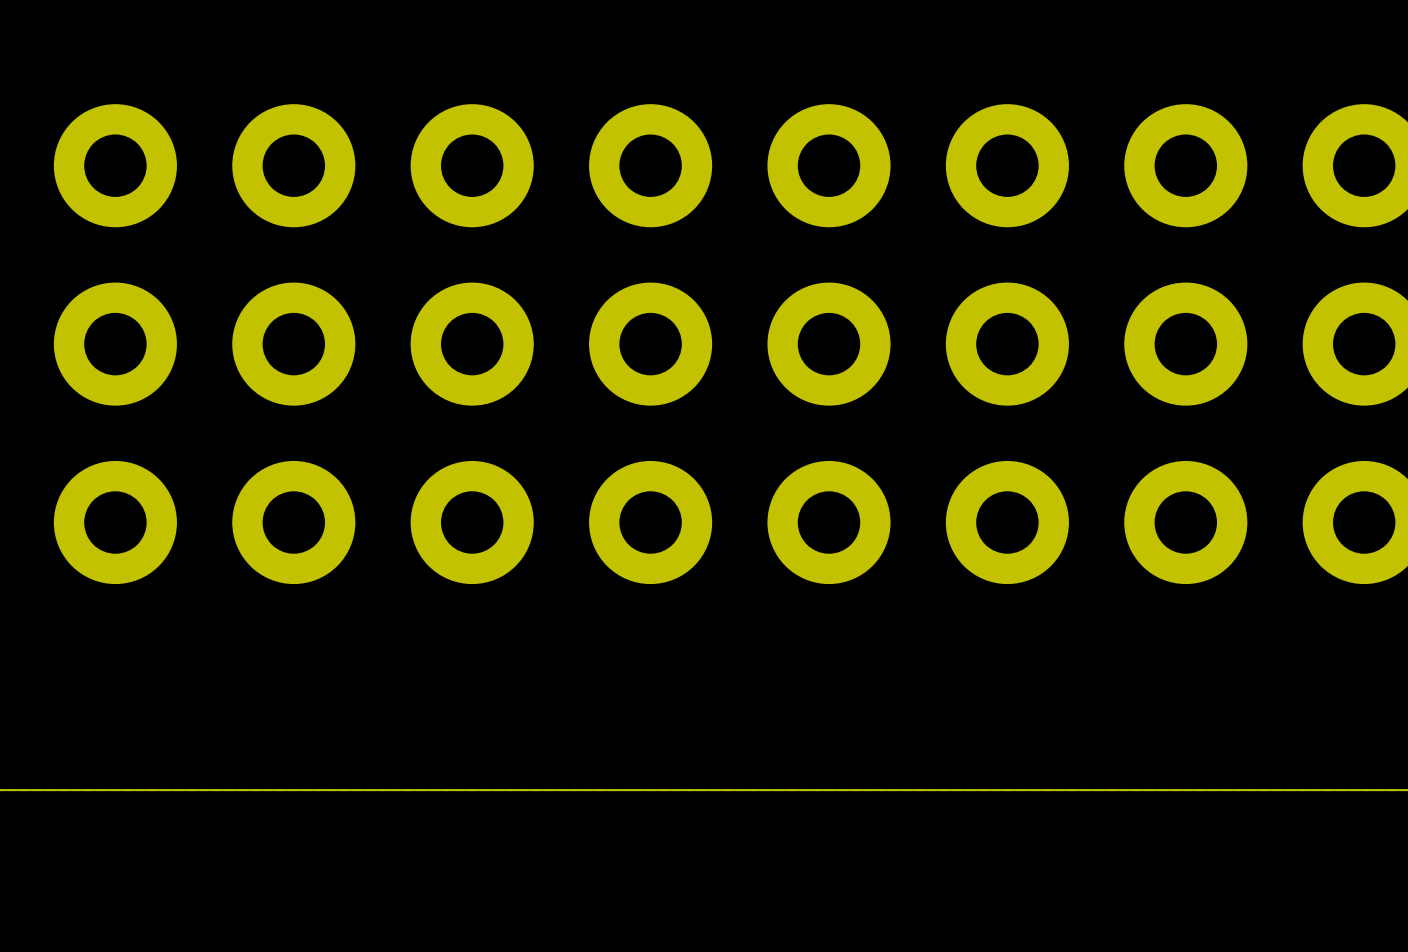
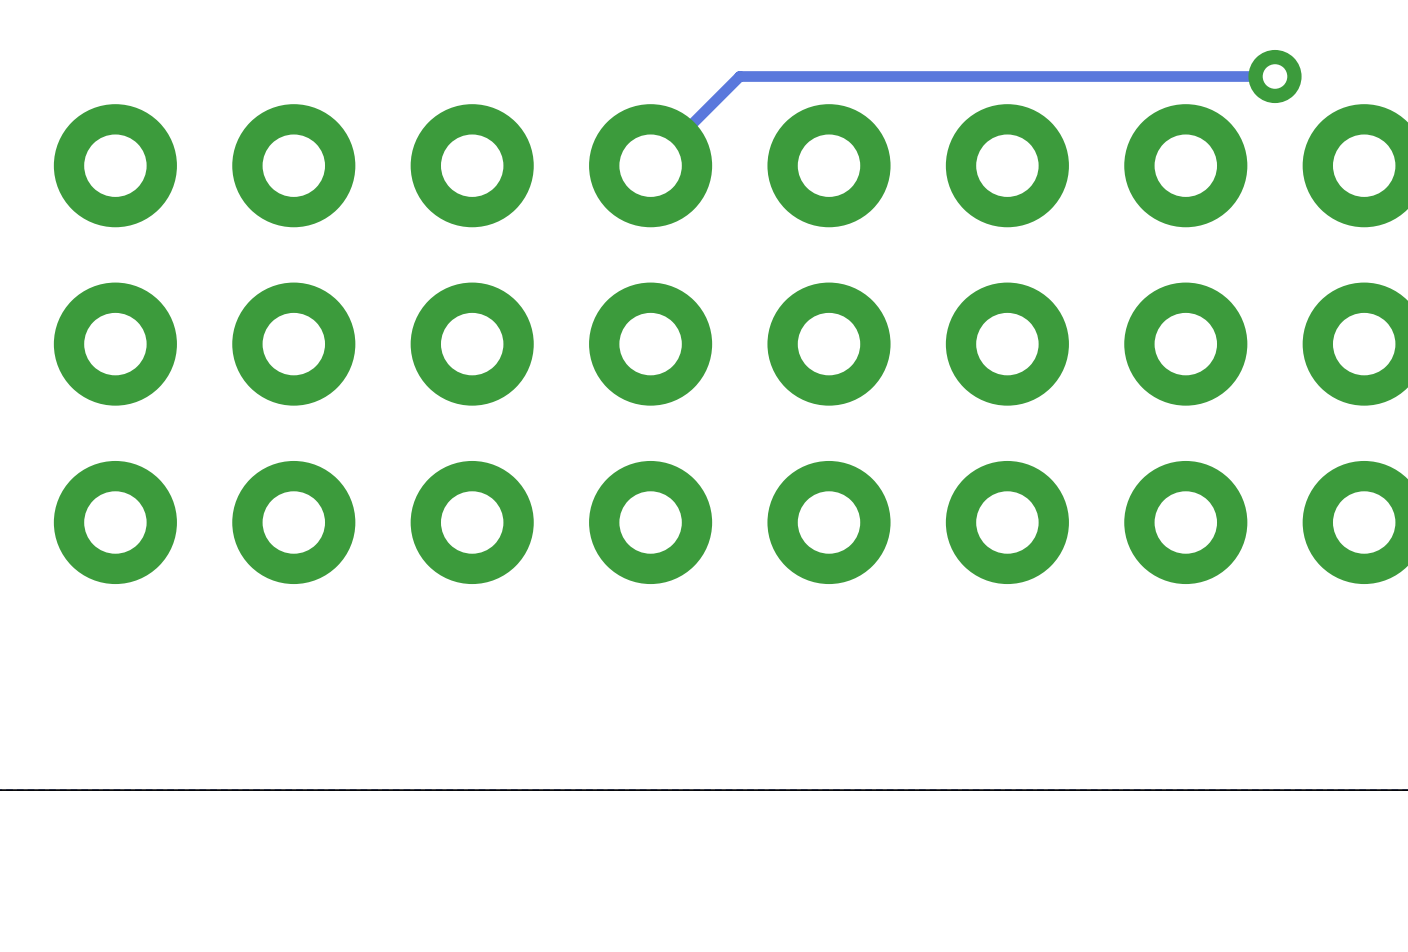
track: none -> (1275, 76) (739, 76) (650, 165)
via: none -> (1275, 76)

